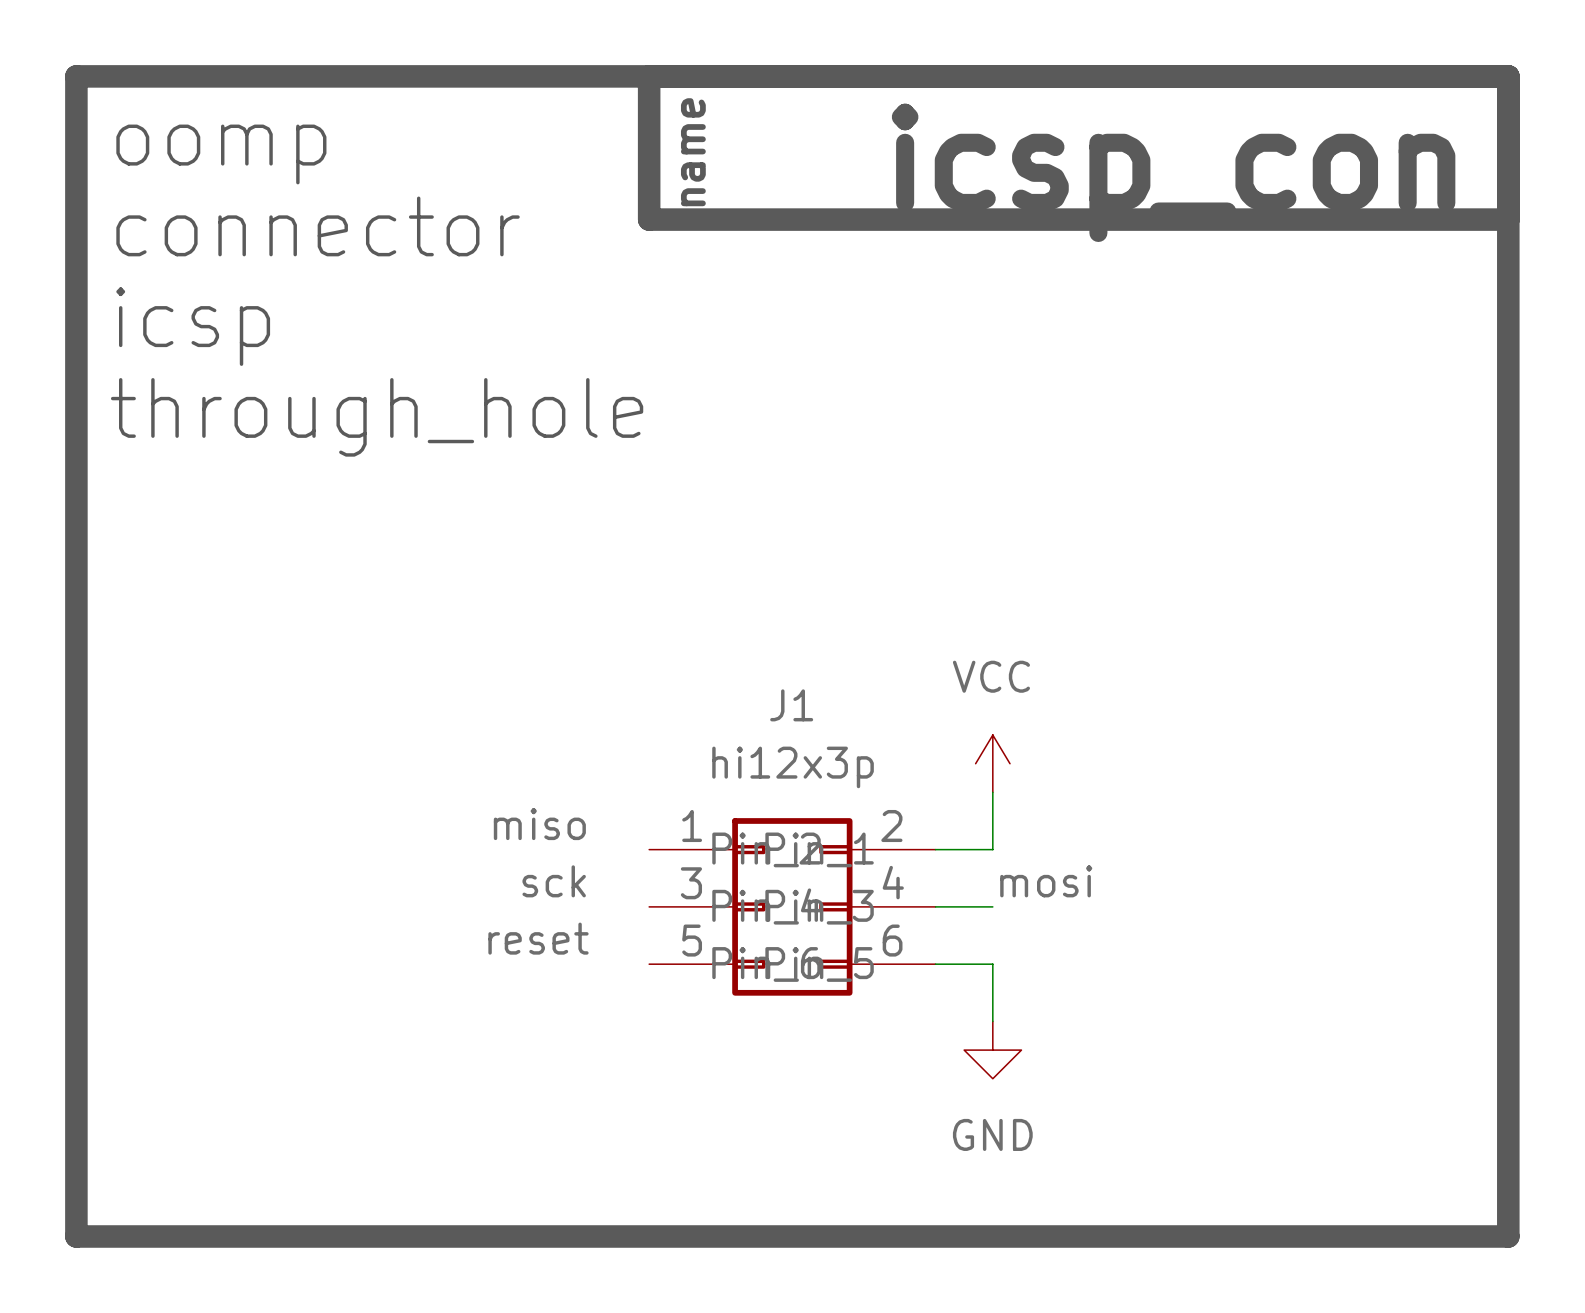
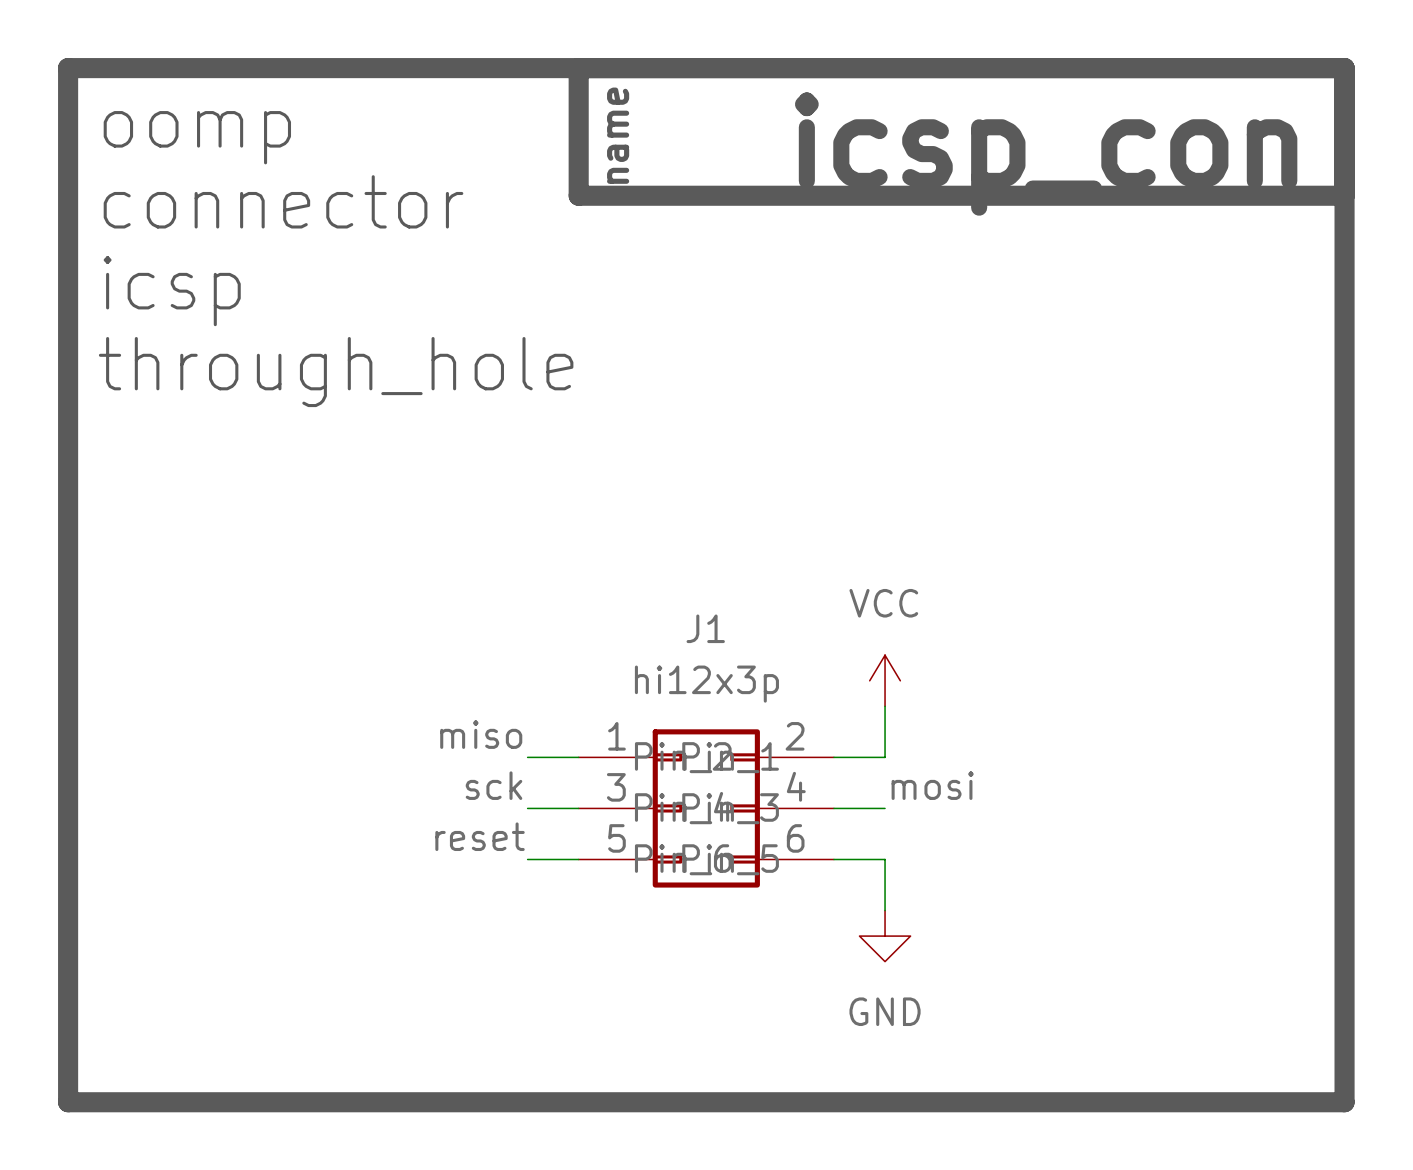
wire: none -> (527, 757) (578, 757)
wire: none -> (527, 808) (578, 808)
wire: none -> (527, 859) (578, 859)

